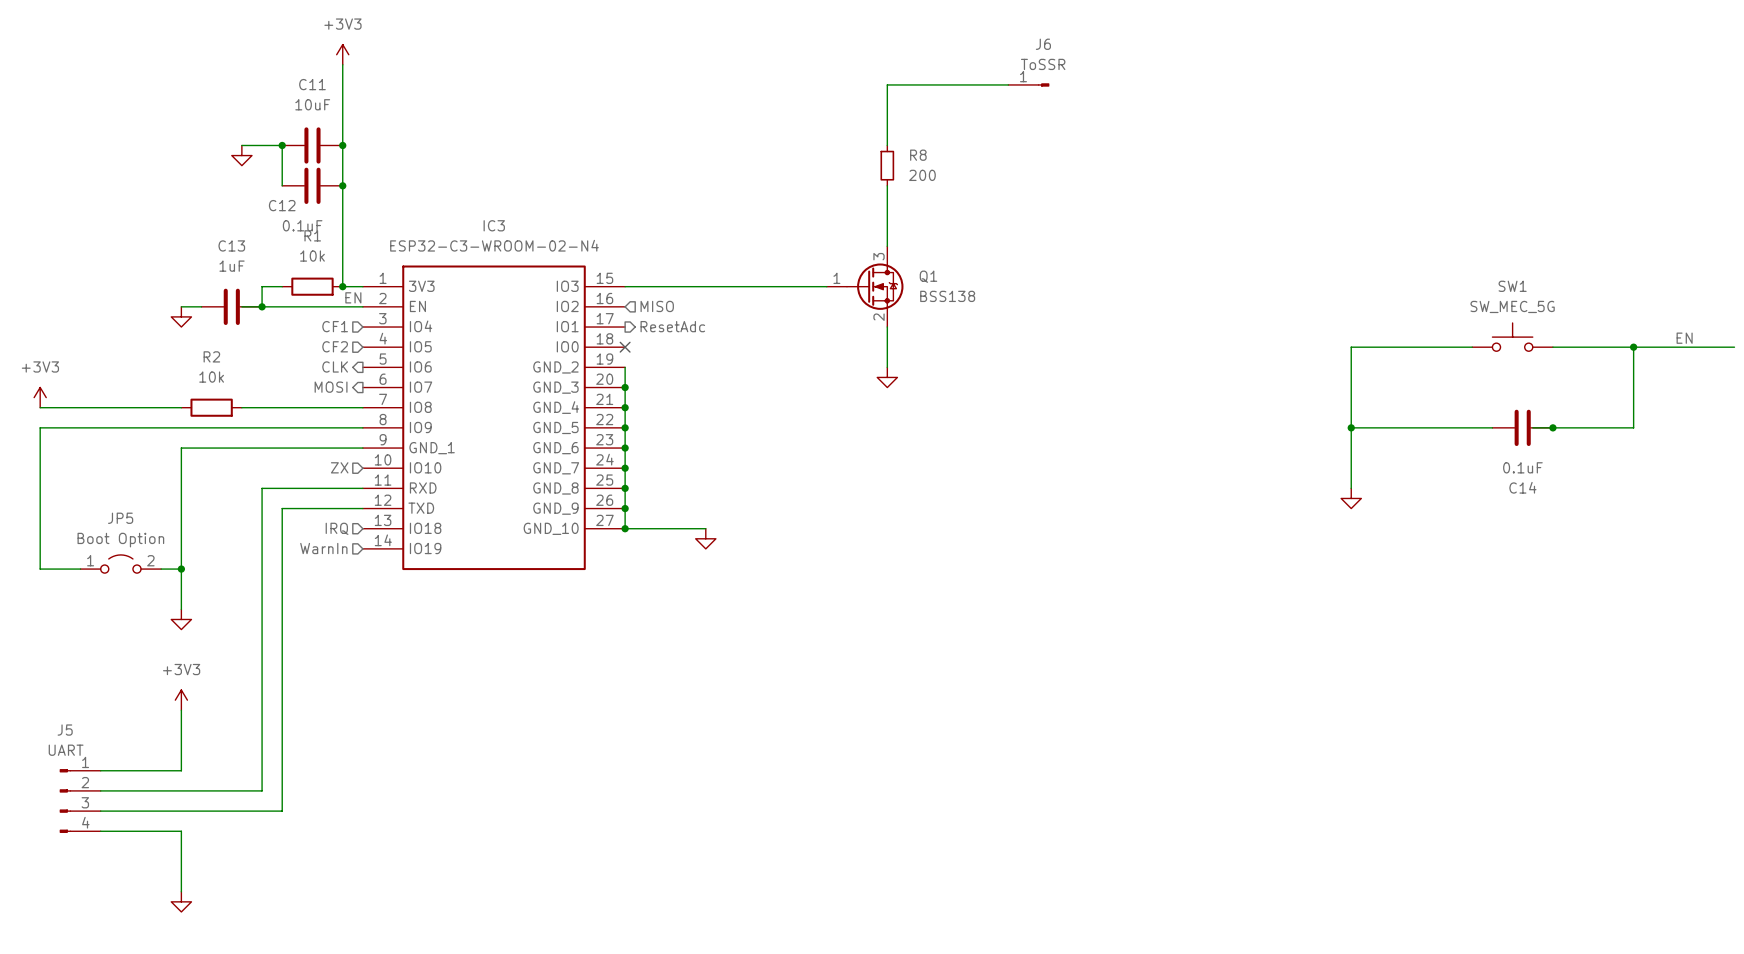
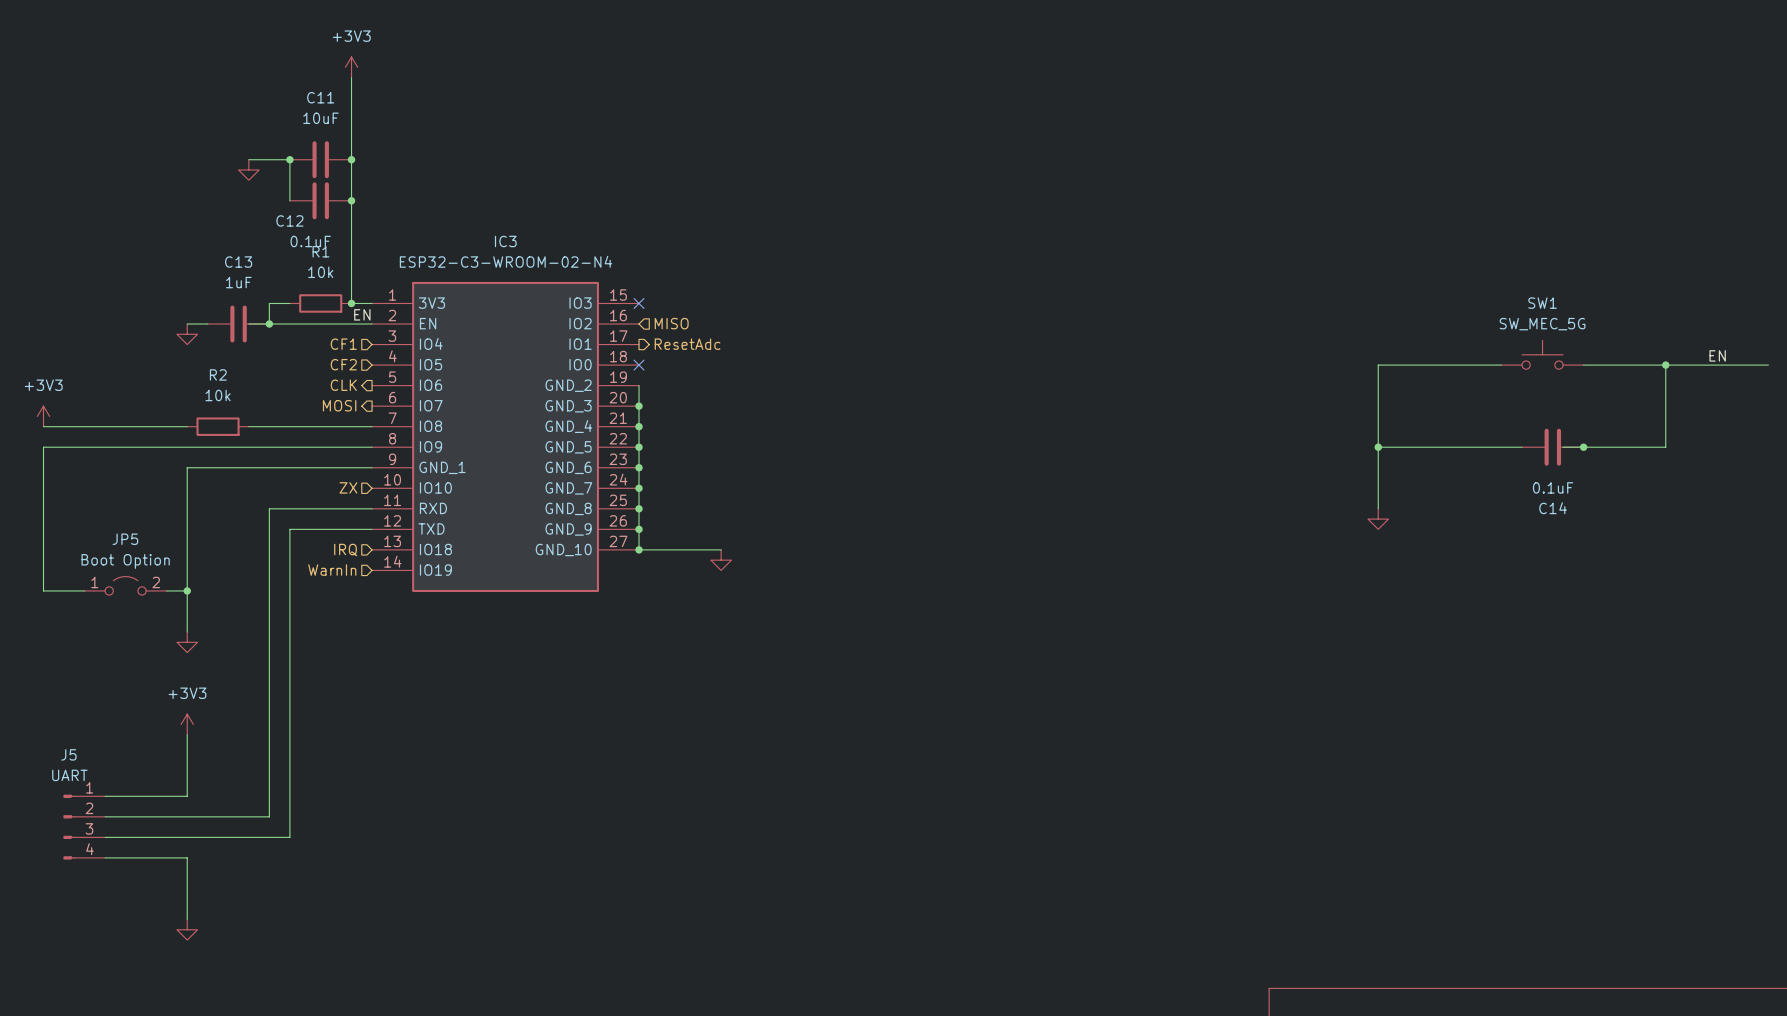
wire: (1008, 84) (887, 84) (887, 145) -> none
J6: ToSSR (1028, 84) -> none
R8: 200 (887, 165) -> none
wire: (887, 185) (887, 246) -> none
wire: (625, 286) (826, 286) -> none
no-connect mark: none -> (639, 303)
Q1: BSS138 (865, 286) -> none
wire: (887, 327) (887, 367) -> none
power symbol: (887, 377) -> none

